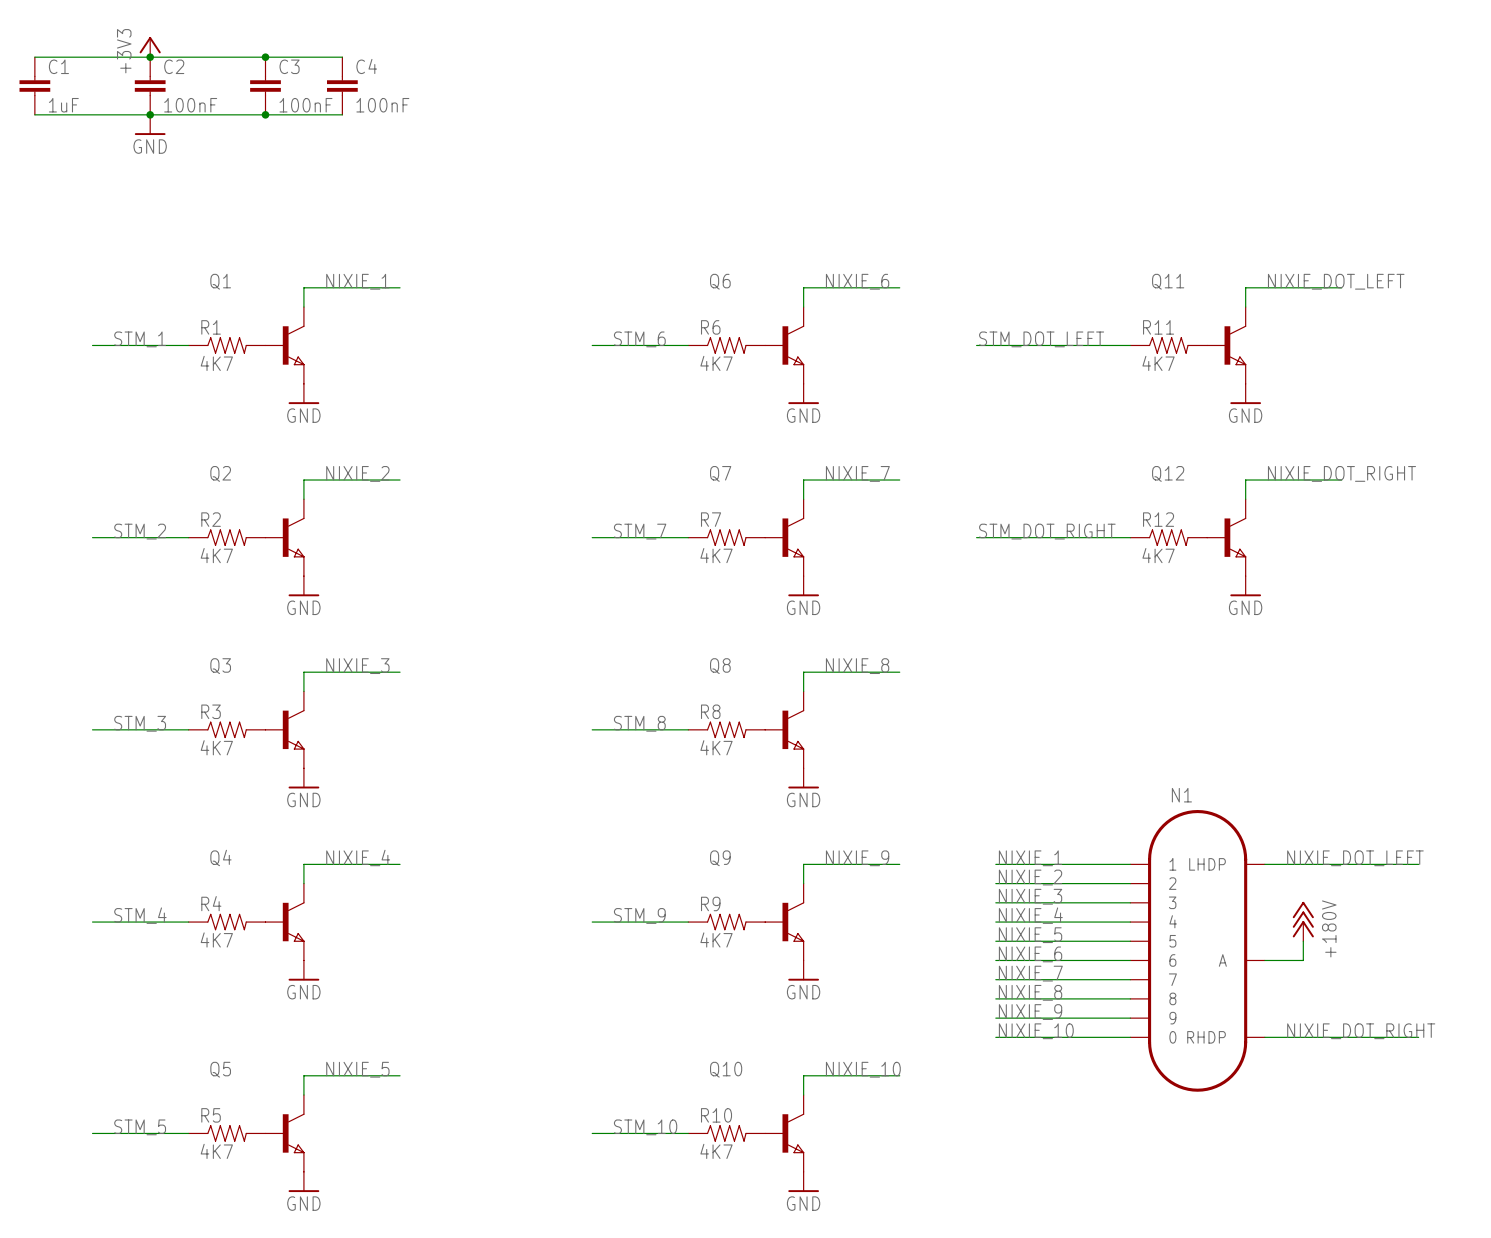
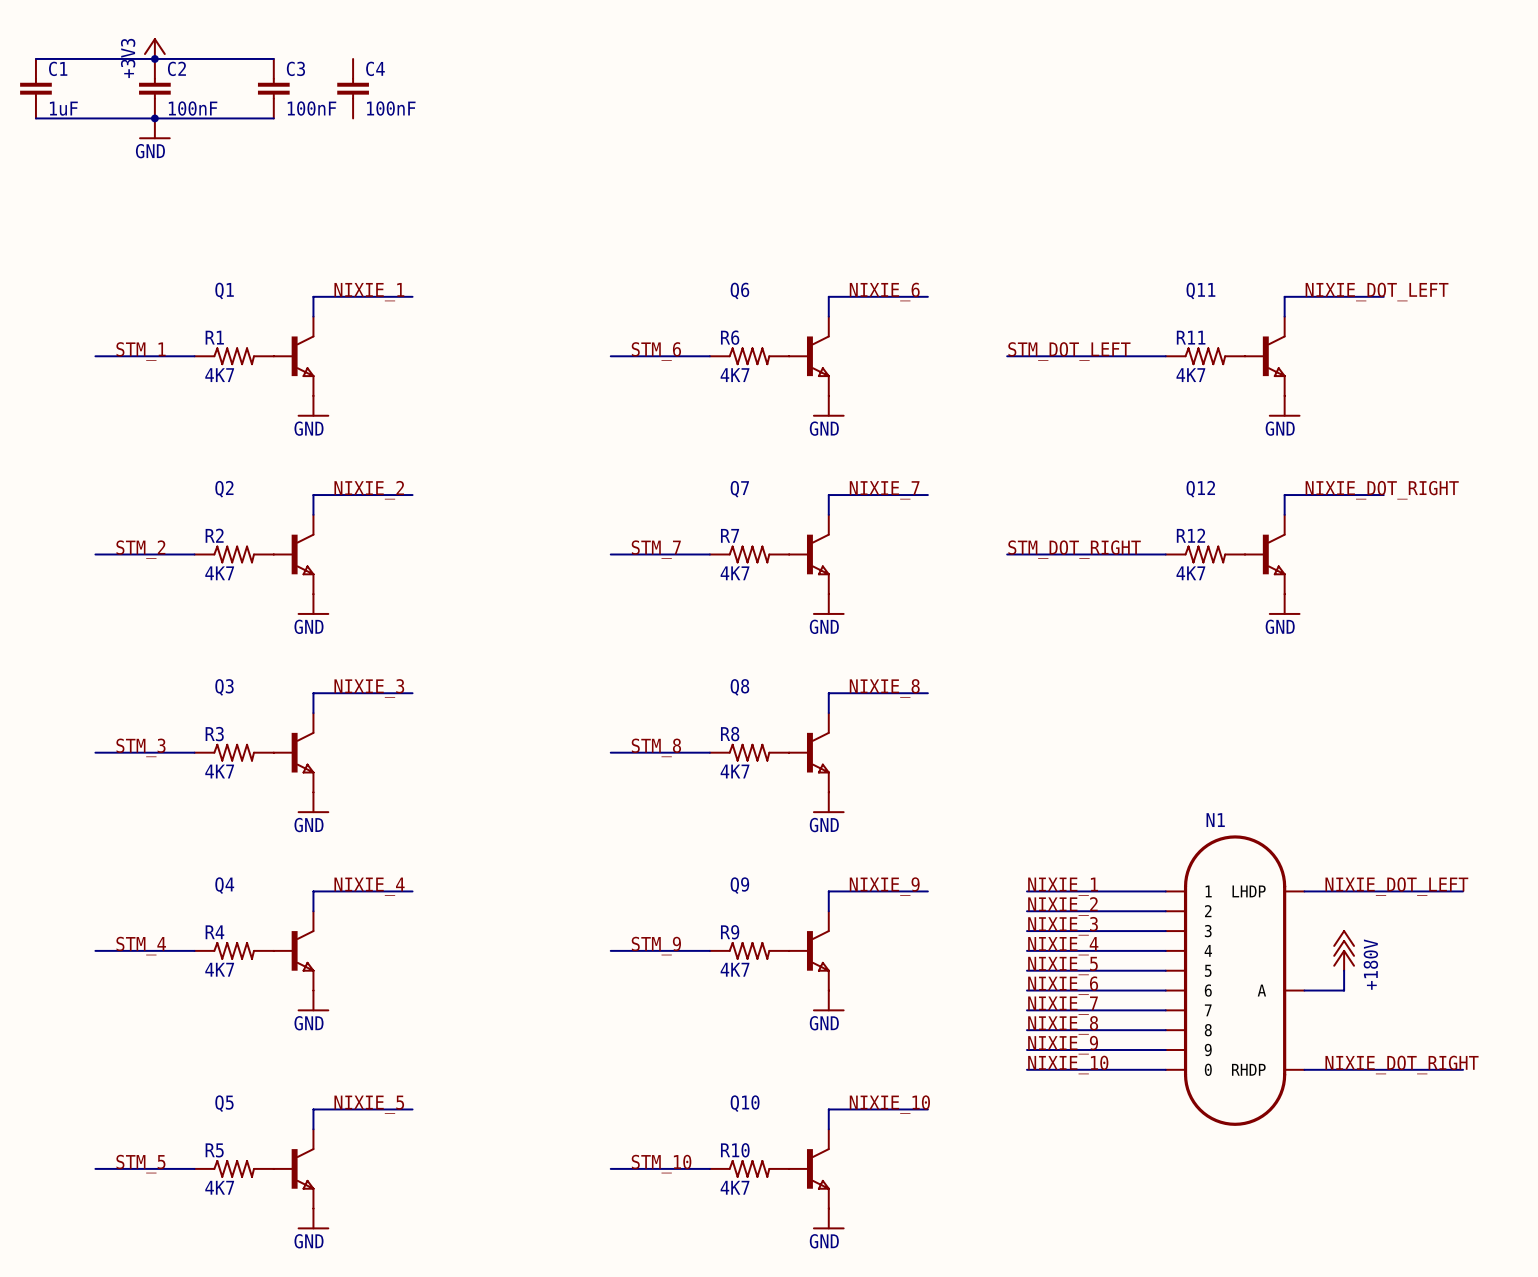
wire: (265, 57) (342, 57) -> none
junction: (265, 57) -> none
wire: (265, 114) (342, 114) -> none
junction: (265, 114) -> none

